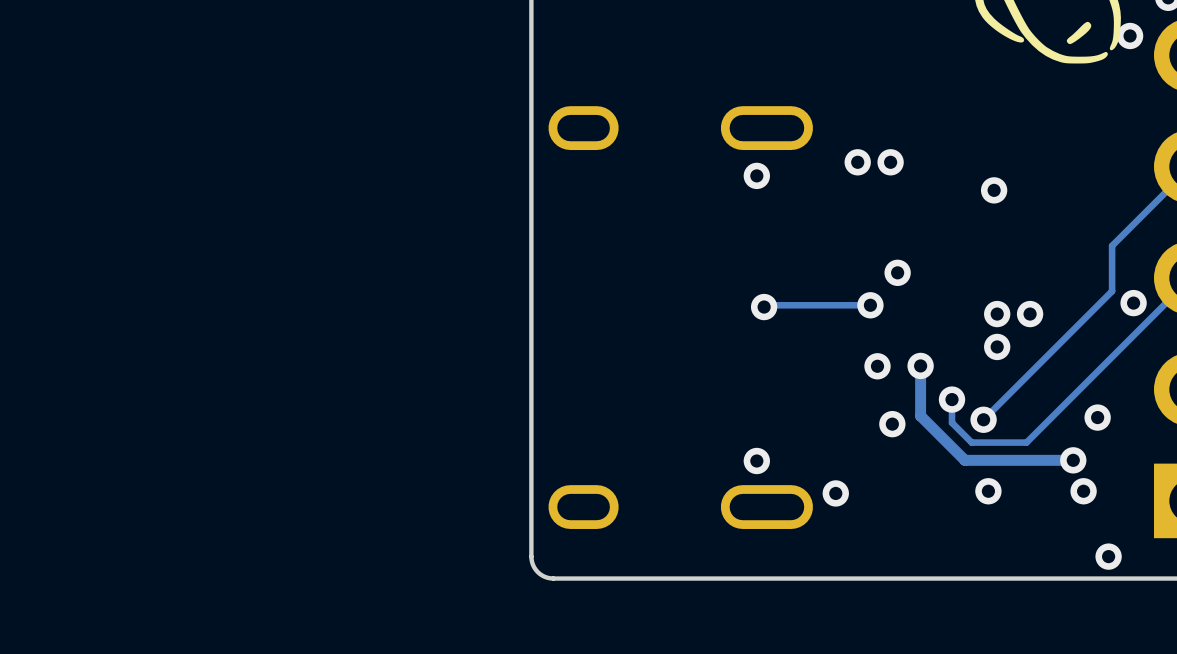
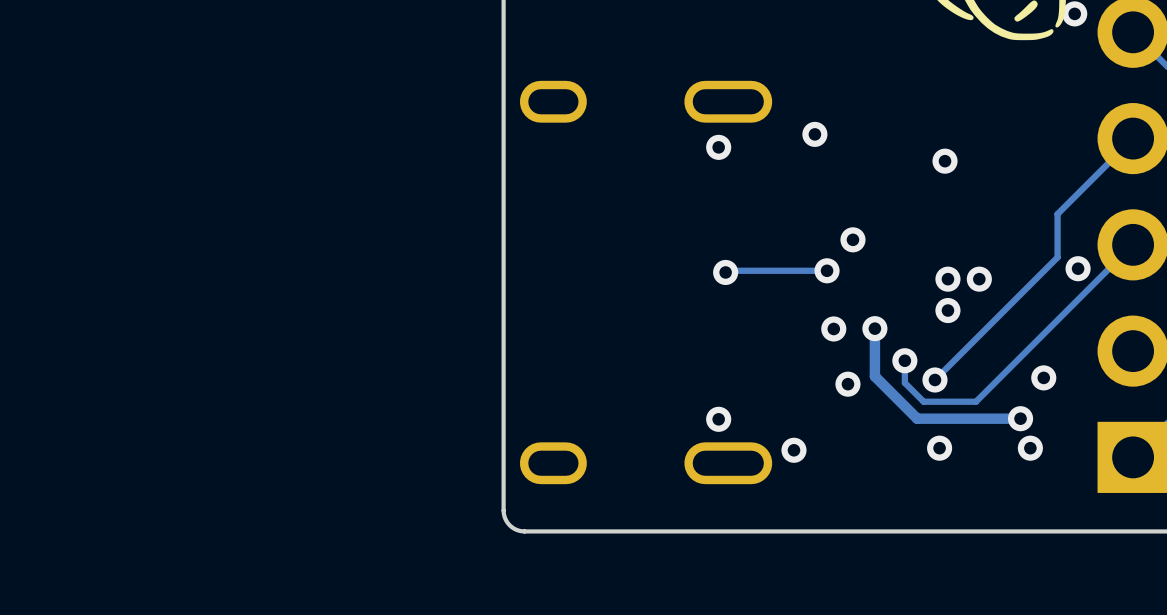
via: (890, 162) -> none
via: (1108, 556) -> none

